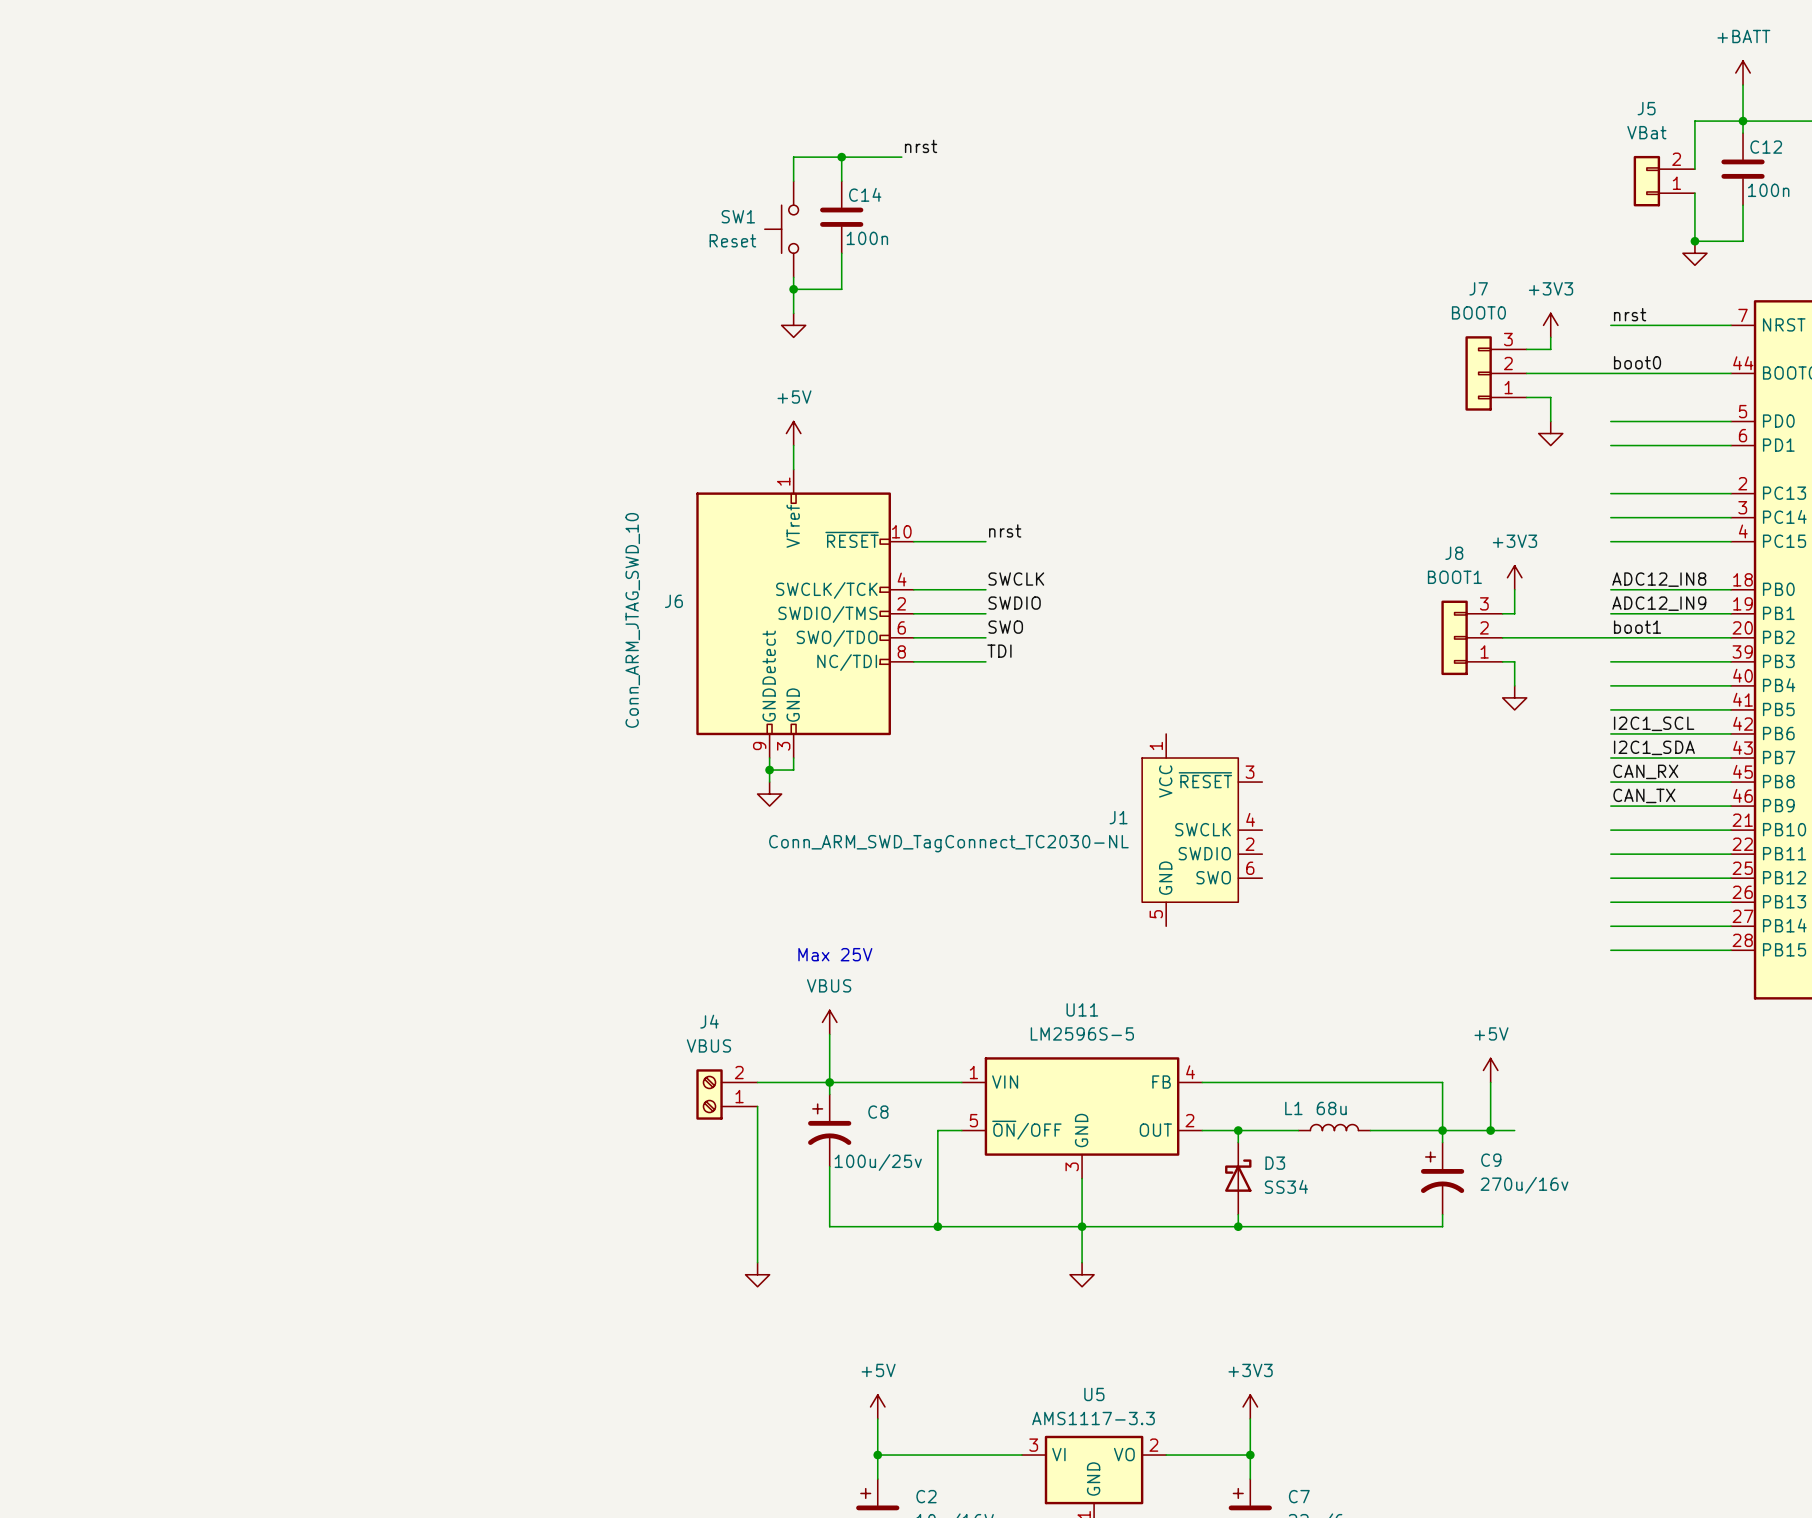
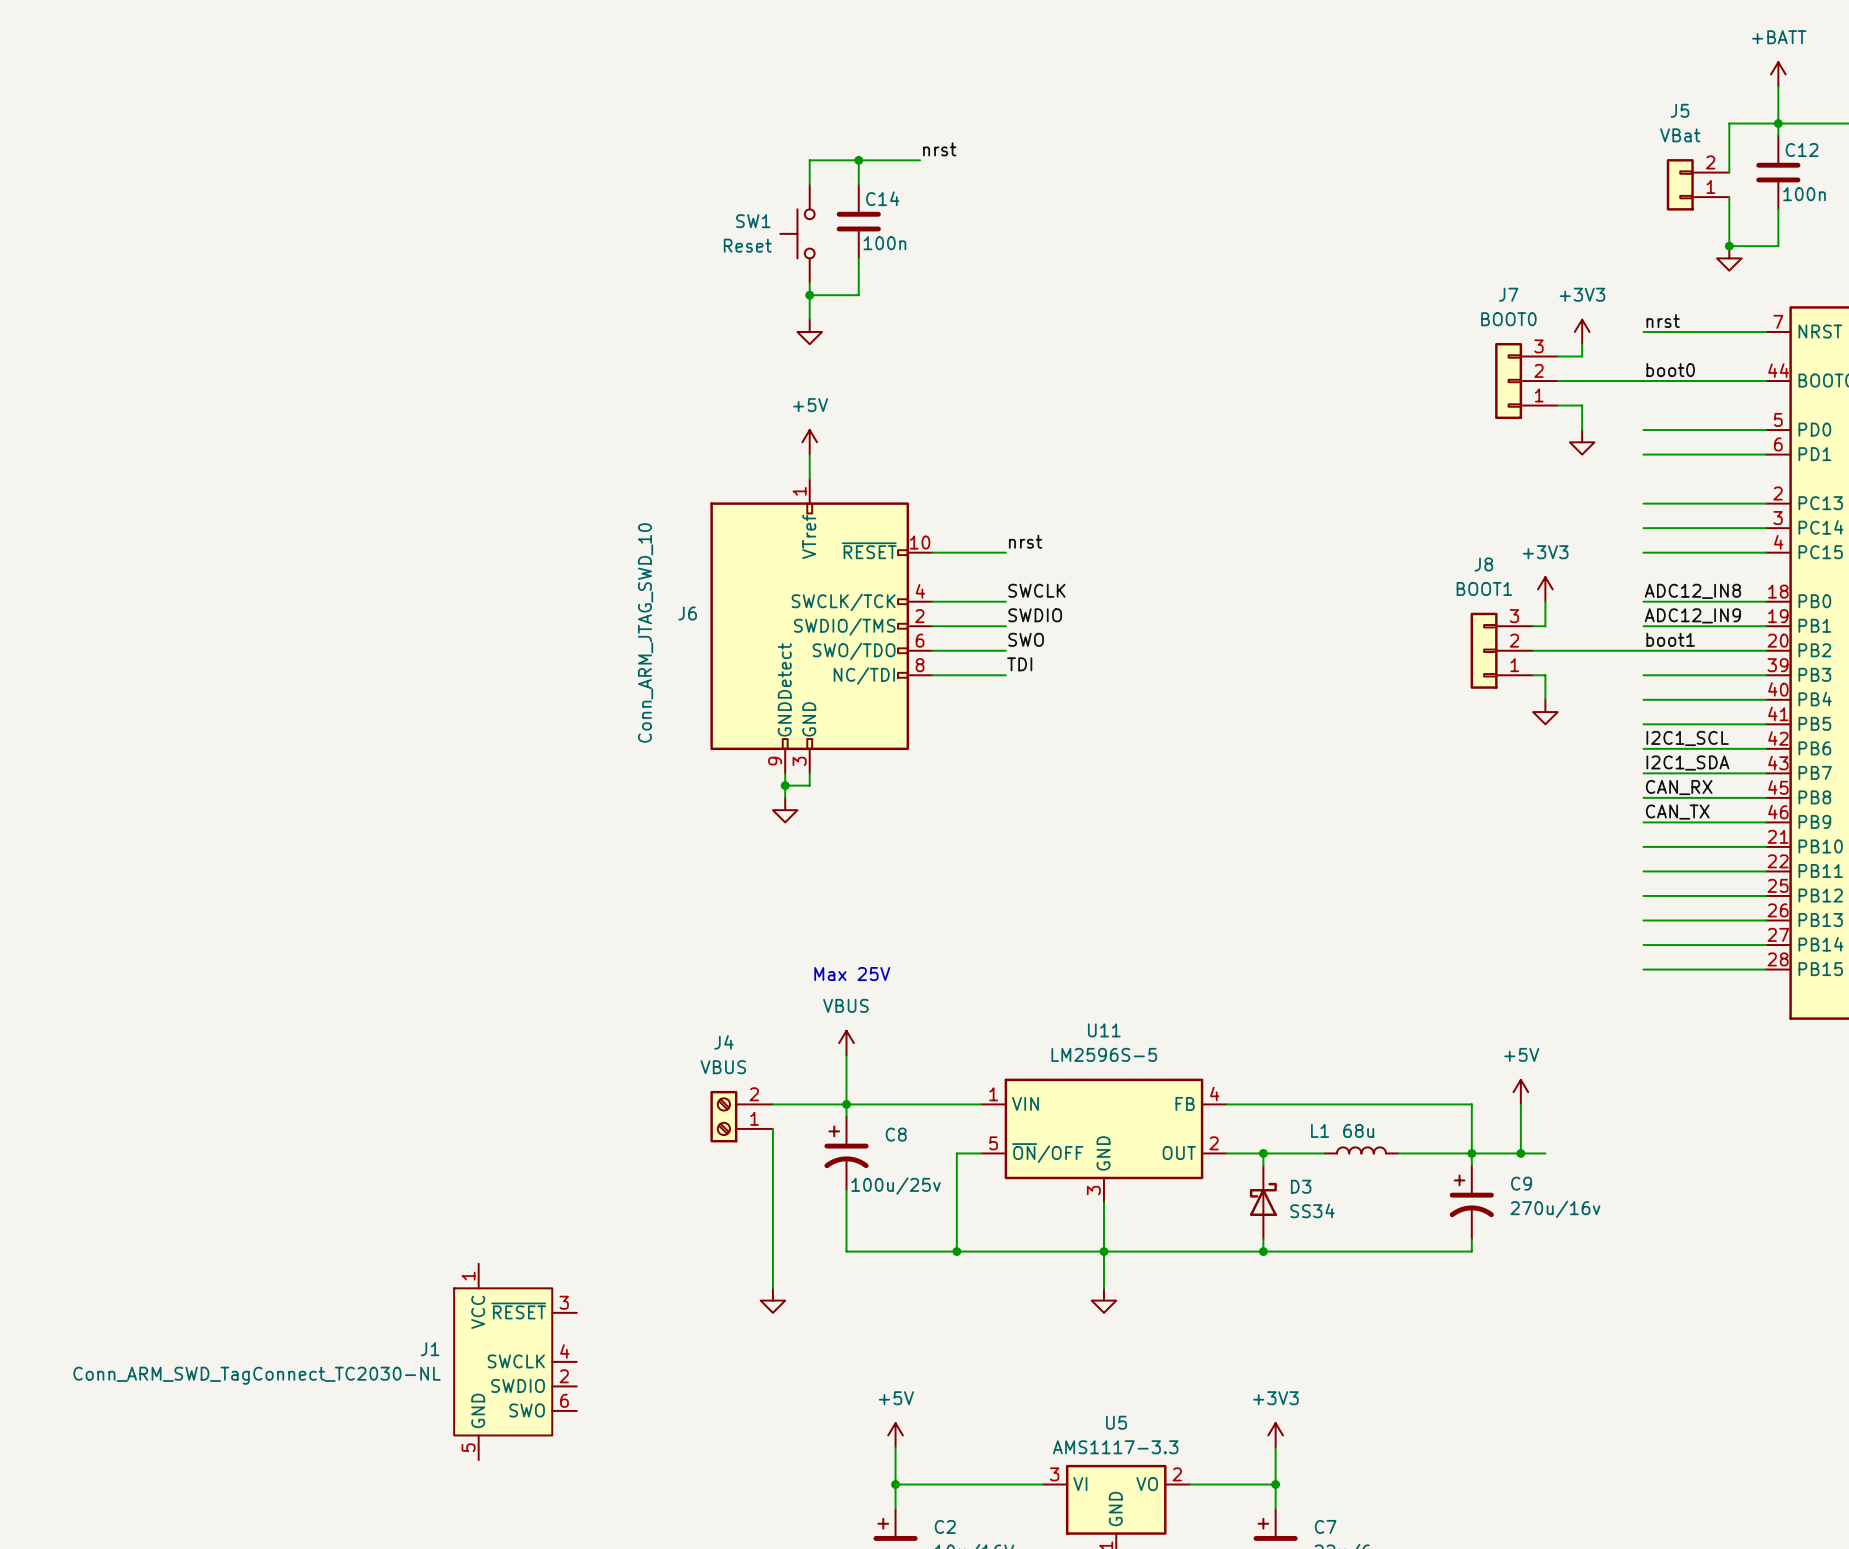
J1 position: (1202, 830) -> (515, 1361)

